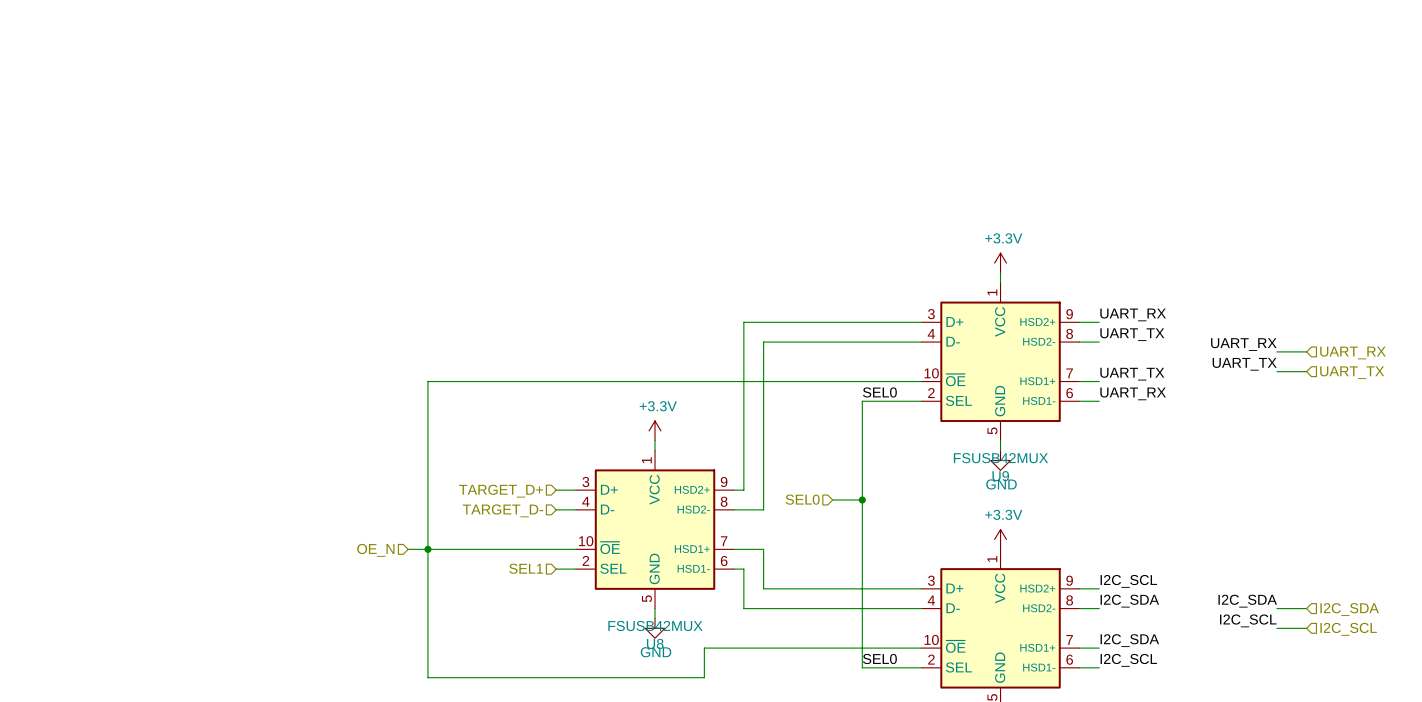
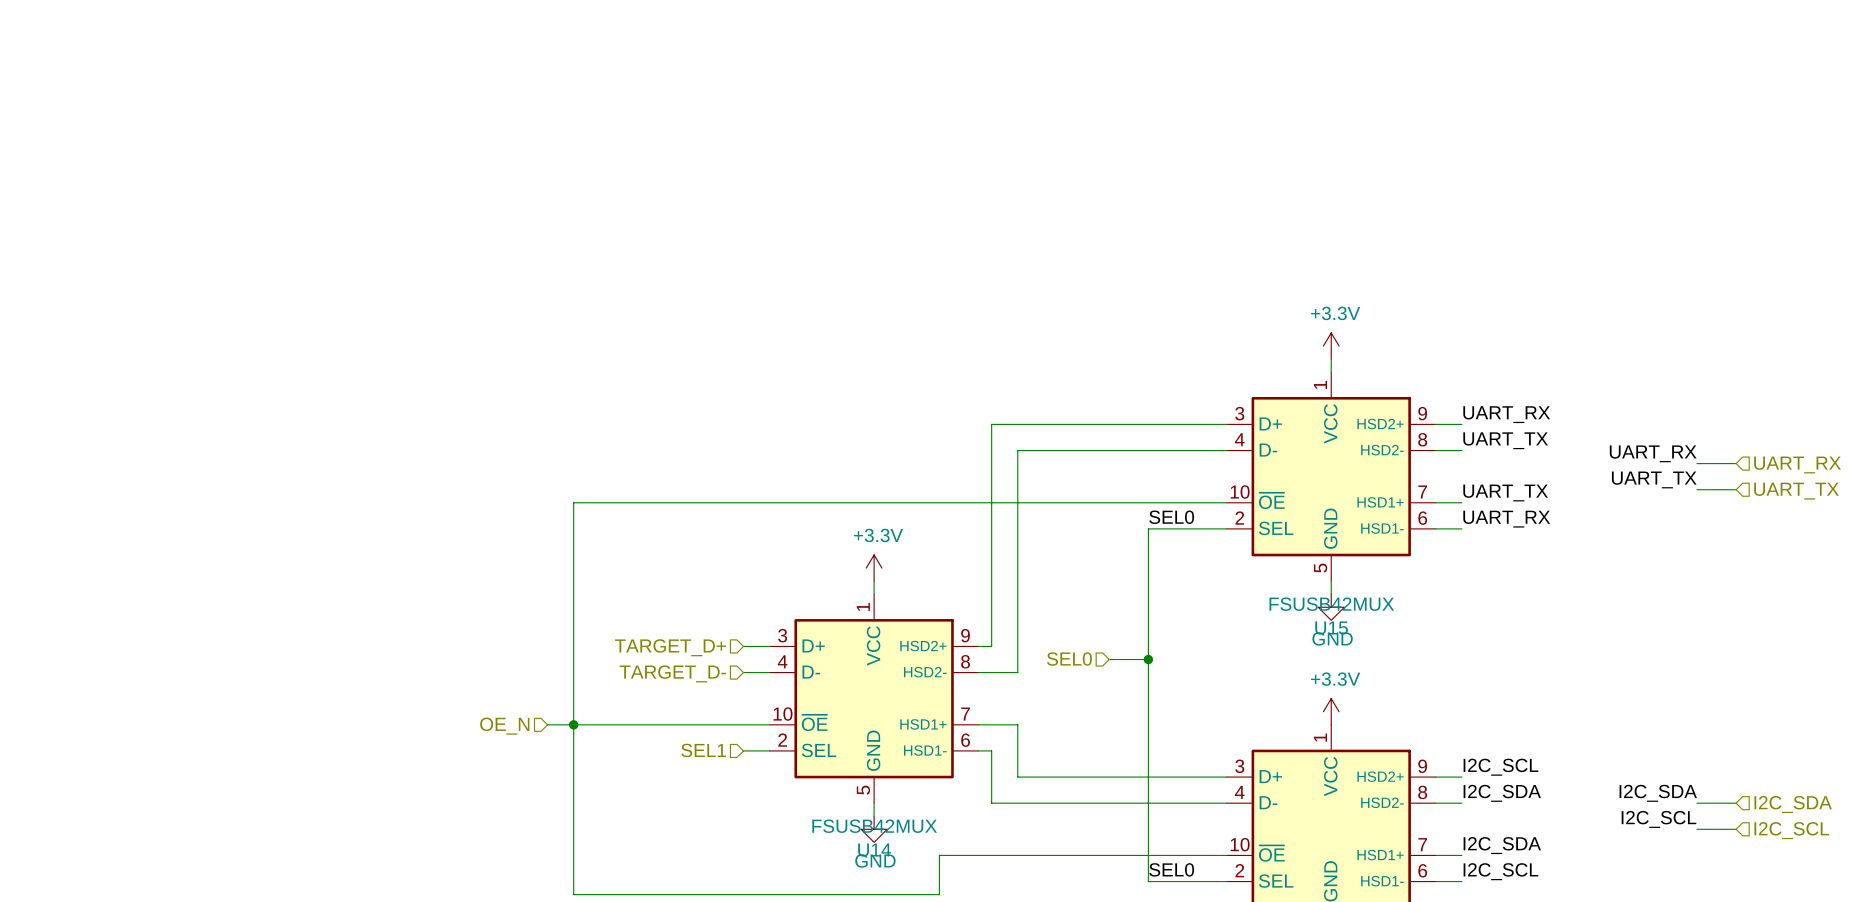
U9 name: U9 (1000, 476) -> U15 (1331, 628)
U8 name: U8 (655, 643) -> U14 (874, 850)

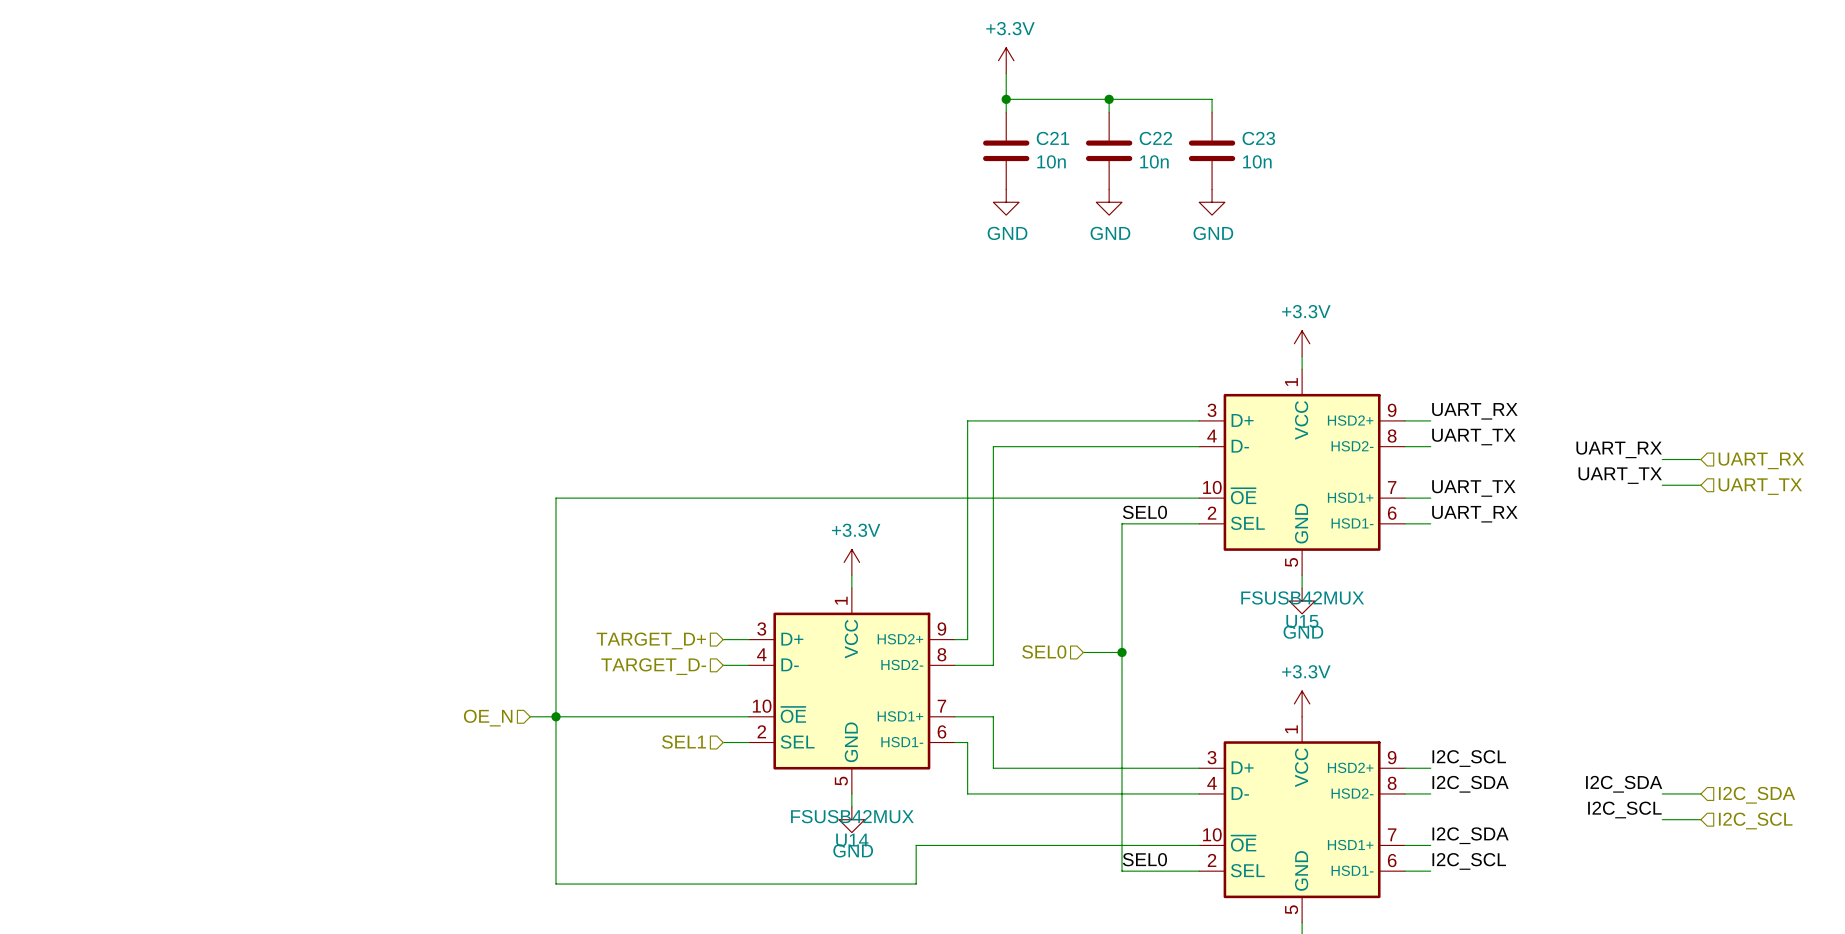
power symbol: none -> +3.3V (1006, 60)
wire: none -> (1006, 73) (1006, 112)
wire: none -> (1006, 99) (1212, 99) (1212, 112)
junction: none -> (1006, 99)
wire: none -> (1109, 99) (1109, 112)
junction: none -> (1109, 99)
C21: none -> 10n (1006, 150)
C22: none -> 10n (1109, 150)
C23: none -> 10n (1212, 150)
power symbol: none -> GND (1006, 202)
power symbol: none -> GND (1109, 202)
power symbol: none -> GND (1212, 202)

